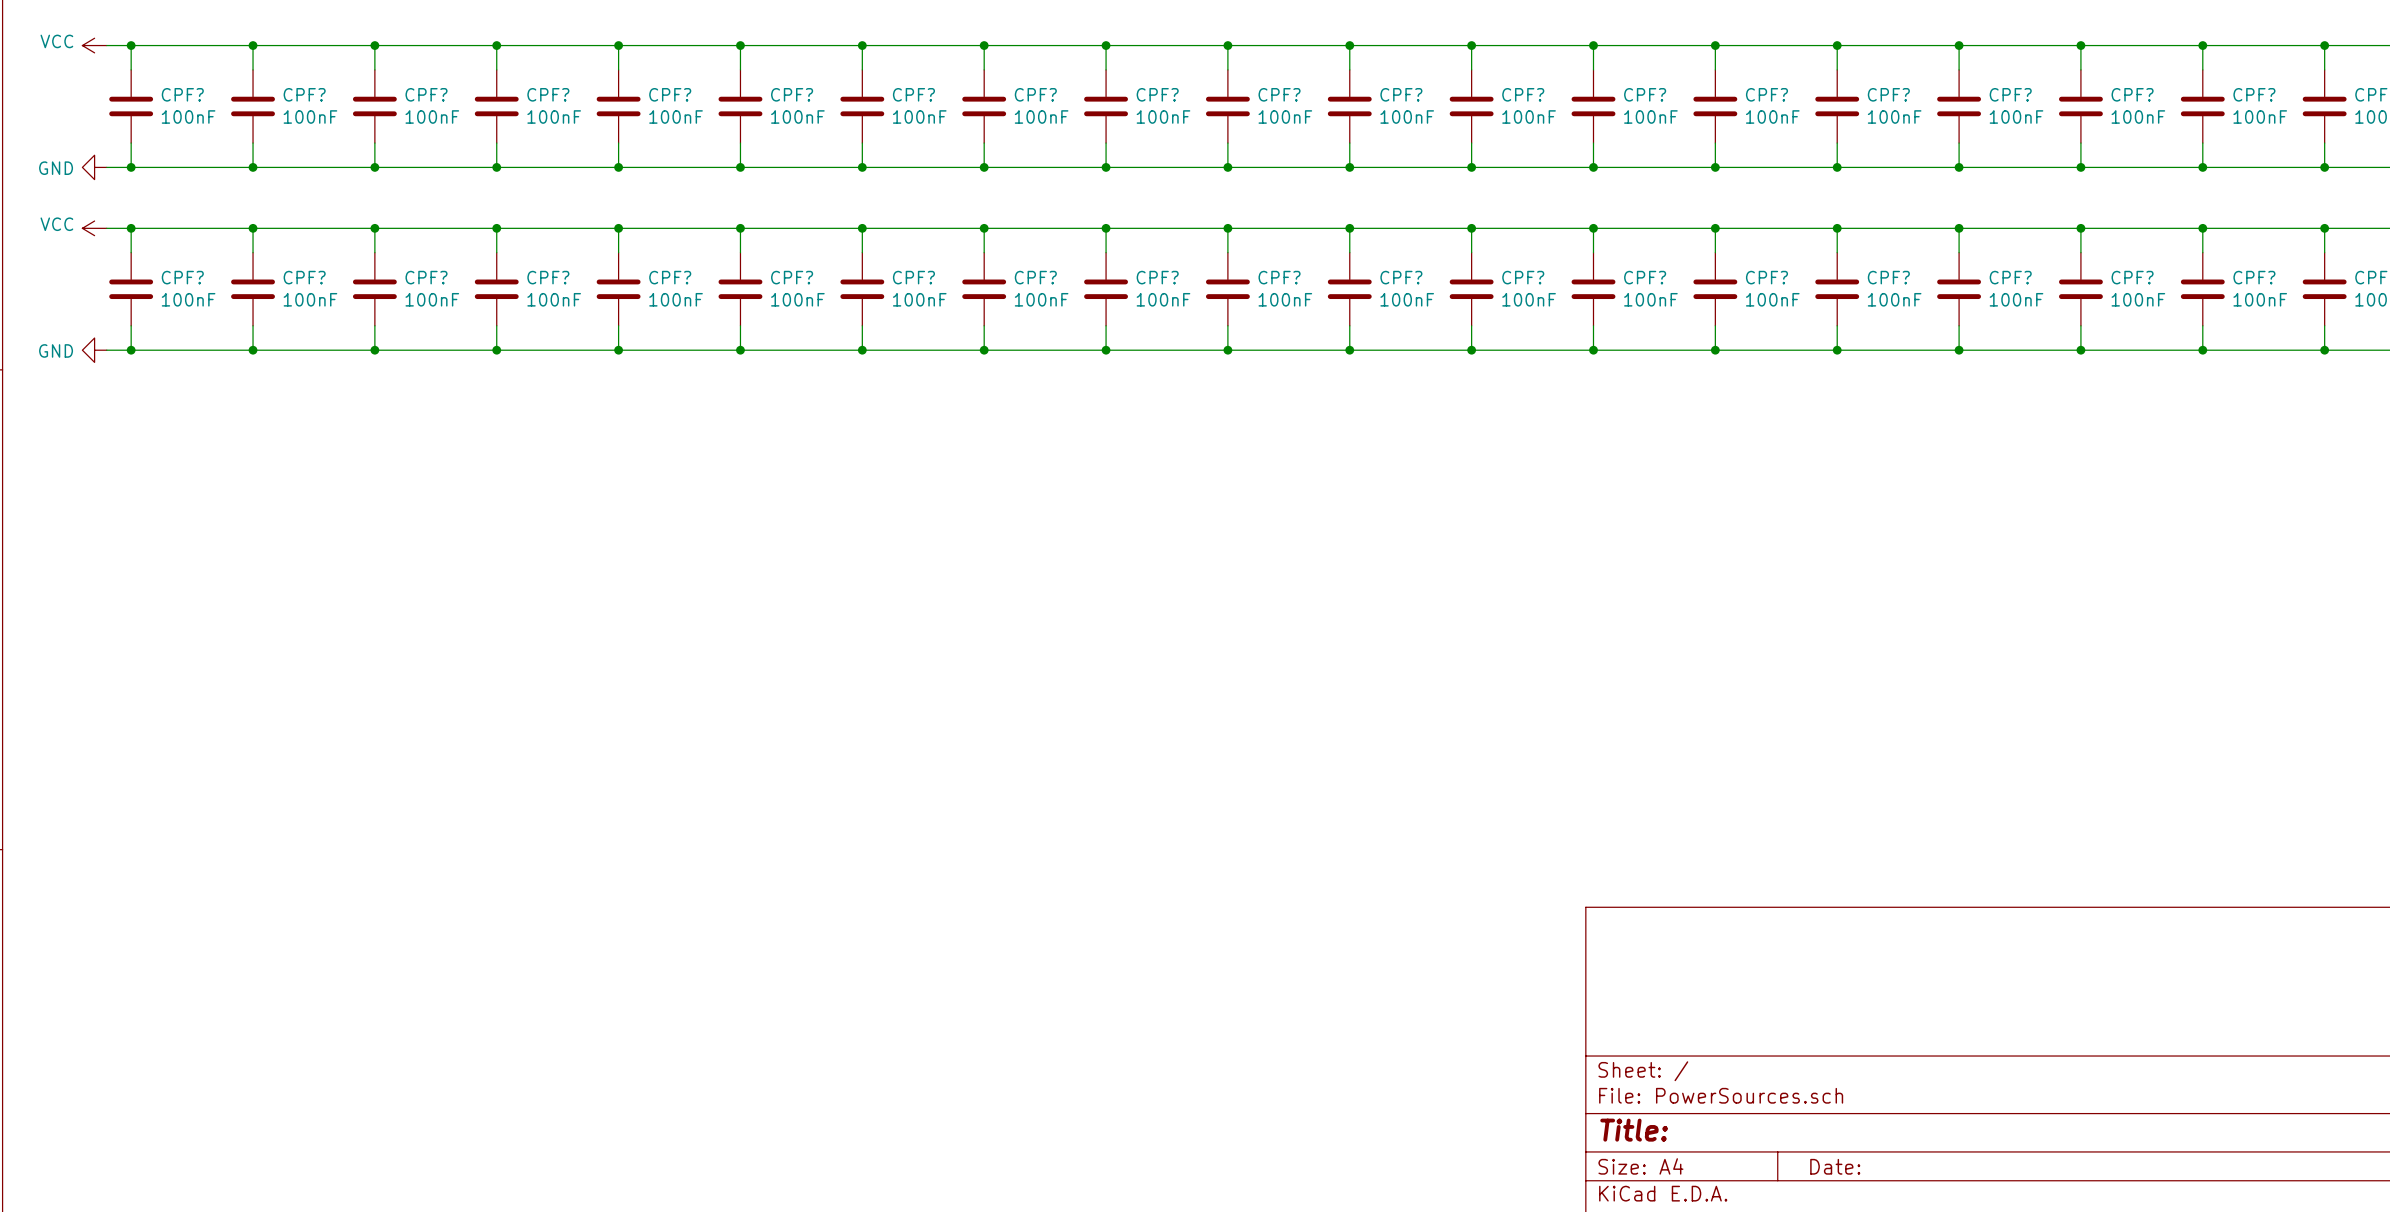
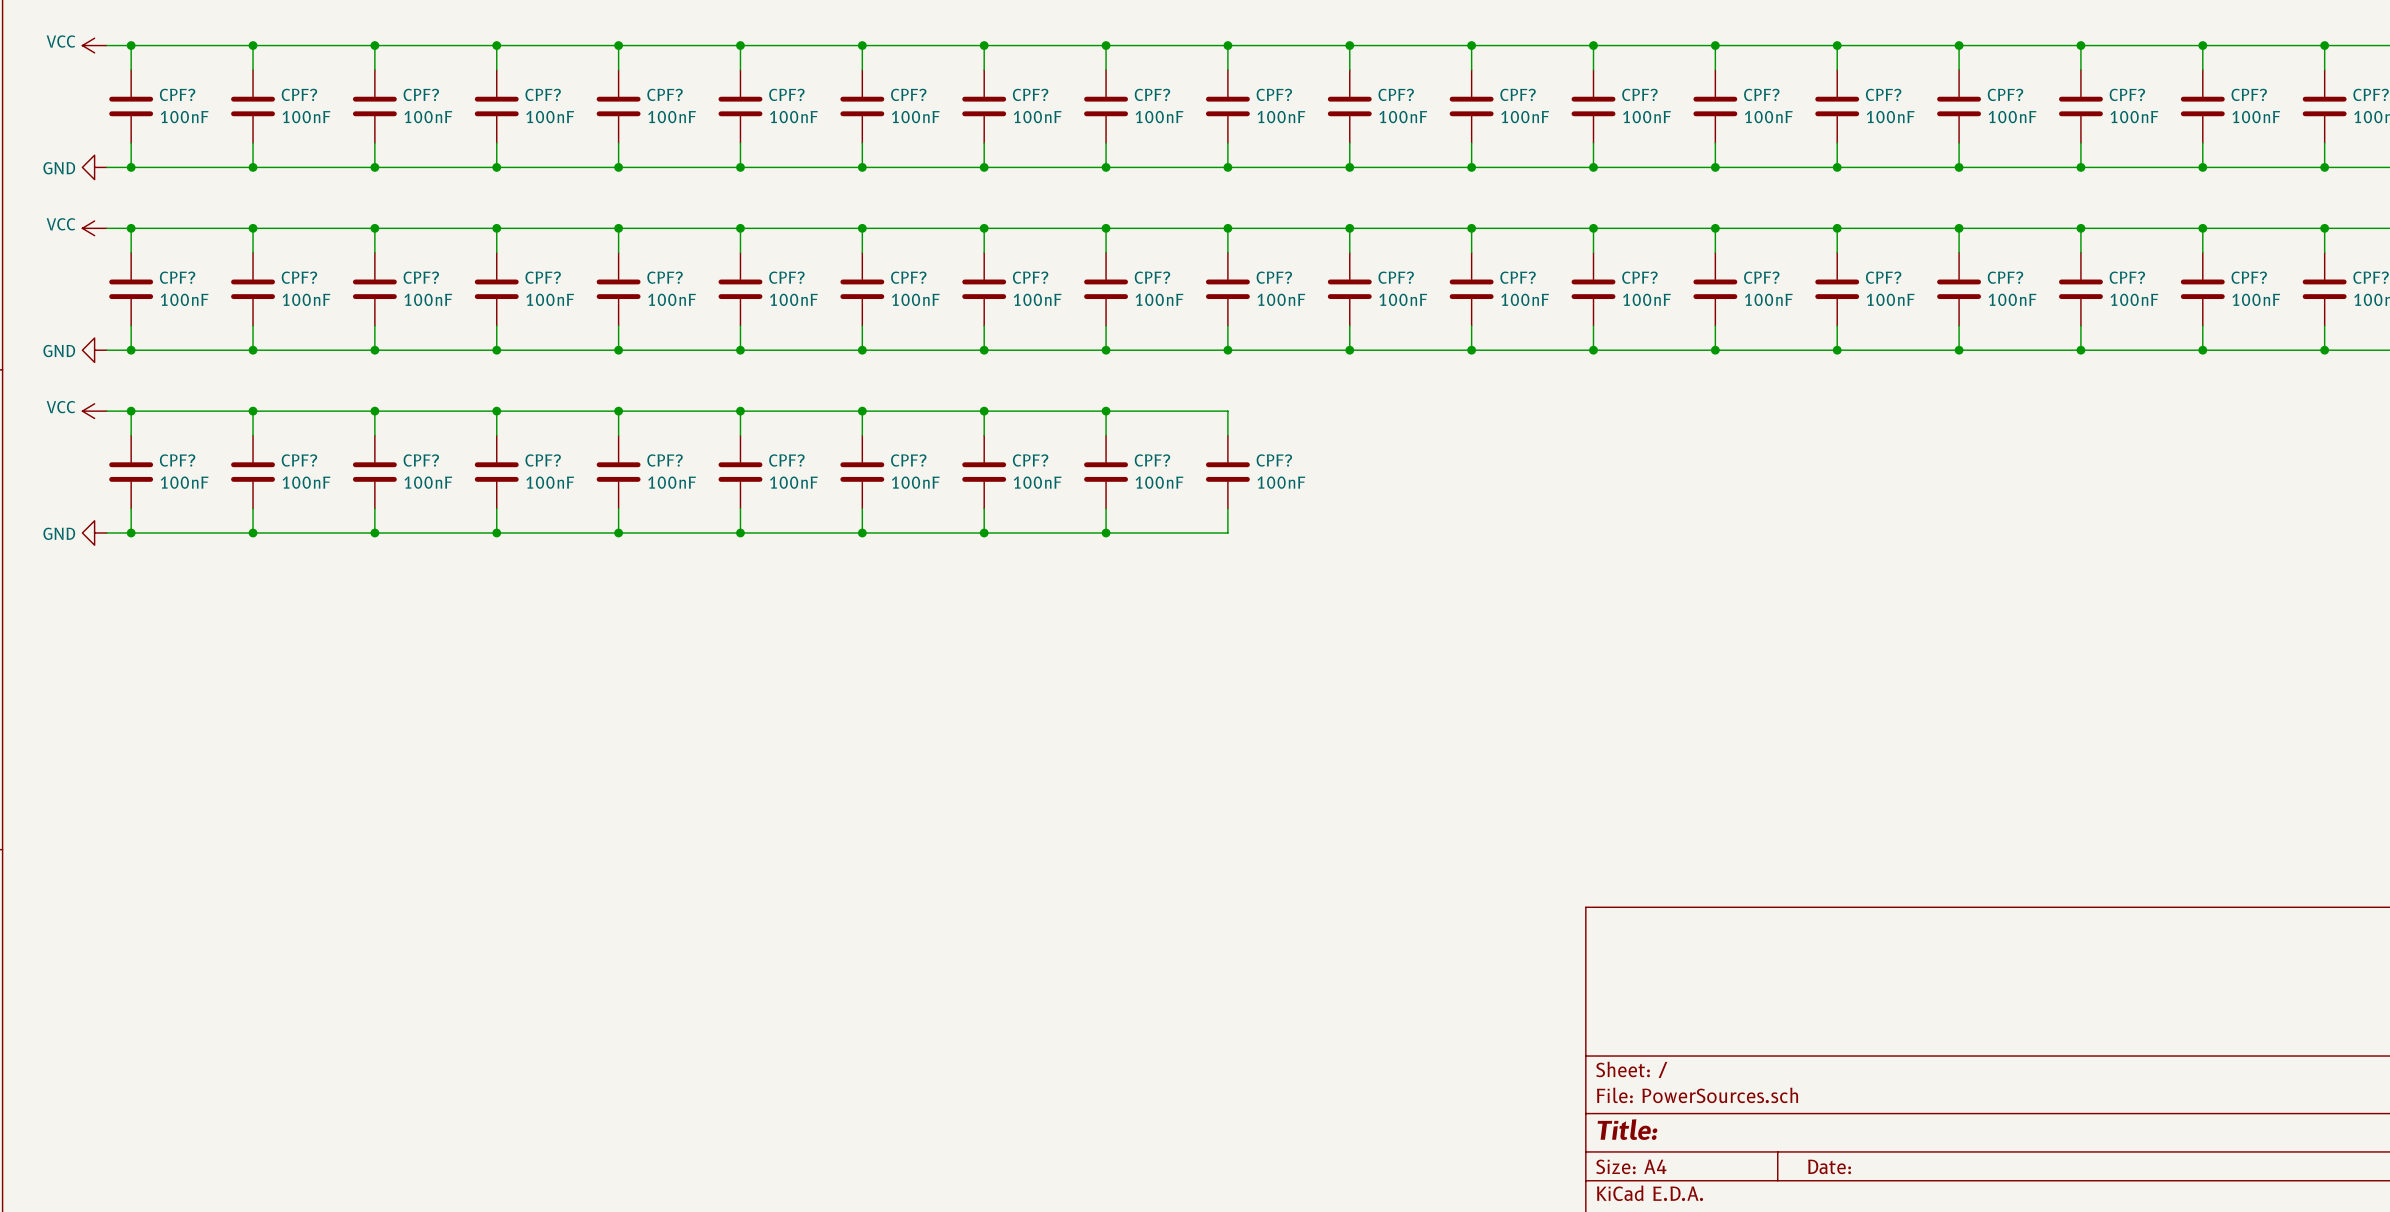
power symbol: none -> VCC (94, 411)
wire: none -> (106, 411) (1227, 411) (1227, 435)
wire: none -> (131, 411) (131, 435)
junction: none -> (131, 411)
wire: none -> (253, 411) (253, 435)
junction: none -> (253, 411)
wire: none -> (374, 411) (374, 435)
junction: none -> (374, 411)
wire: none -> (496, 411) (496, 435)
junction: none -> (496, 411)
wire: none -> (618, 411) (618, 435)
junction: none -> (618, 411)
wire: none -> (740, 411) (740, 435)
junction: none -> (740, 411)
wire: none -> (862, 411) (862, 435)
junction: none -> (862, 411)
wire: none -> (984, 411) (984, 435)
junction: none -> (984, 411)
wire: none -> (1106, 411) (1106, 435)
junction: none -> (1106, 411)
CPF?: none -> 100nF (131, 472)
CPF?: none -> 100nF (253, 472)
CPF?: none -> 100nF (374, 472)
CPF?: none -> 100nF (496, 472)
CPF?: none -> 100nF (618, 472)
CPF?: none -> 100nF (740, 472)
CPF?: none -> 100nF (862, 472)
CPF?: none -> 100nF (984, 472)
CPF?: none -> 100nF (1106, 472)
CPF?: none -> 100nF (1227, 472)
wire: none -> (131, 508) (131, 532)
wire: none -> (253, 508) (253, 532)
wire: none -> (374, 508) (374, 532)
wire: none -> (496, 508) (496, 532)
wire: none -> (618, 508) (618, 532)
wire: none -> (740, 508) (740, 532)
wire: none -> (862, 508) (862, 532)
wire: none -> (984, 508) (984, 532)
wire: none -> (1106, 508) (1106, 532)
wire: none -> (1227, 508) (1227, 532) (106, 532)
power symbol: none -> GND (94, 532)
junction: none -> (131, 532)
junction: none -> (253, 532)
junction: none -> (374, 532)
junction: none -> (496, 532)
junction: none -> (618, 532)
junction: none -> (740, 532)
junction: none -> (862, 532)
junction: none -> (984, 532)
junction: none -> (1106, 532)

